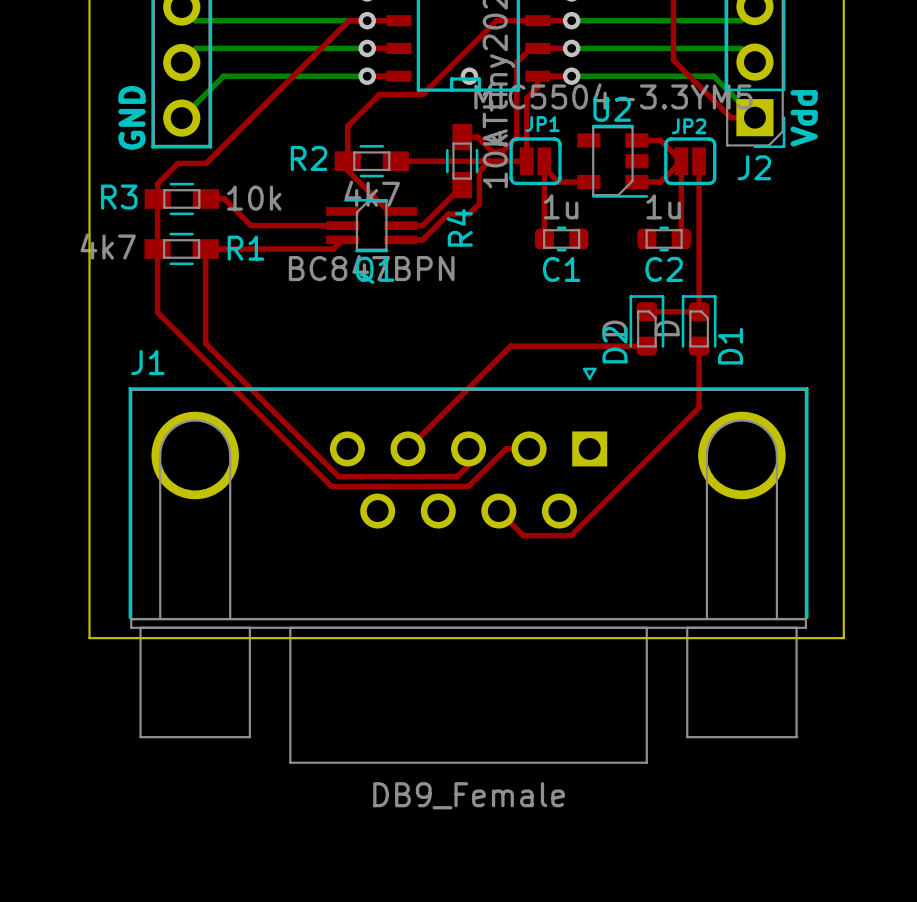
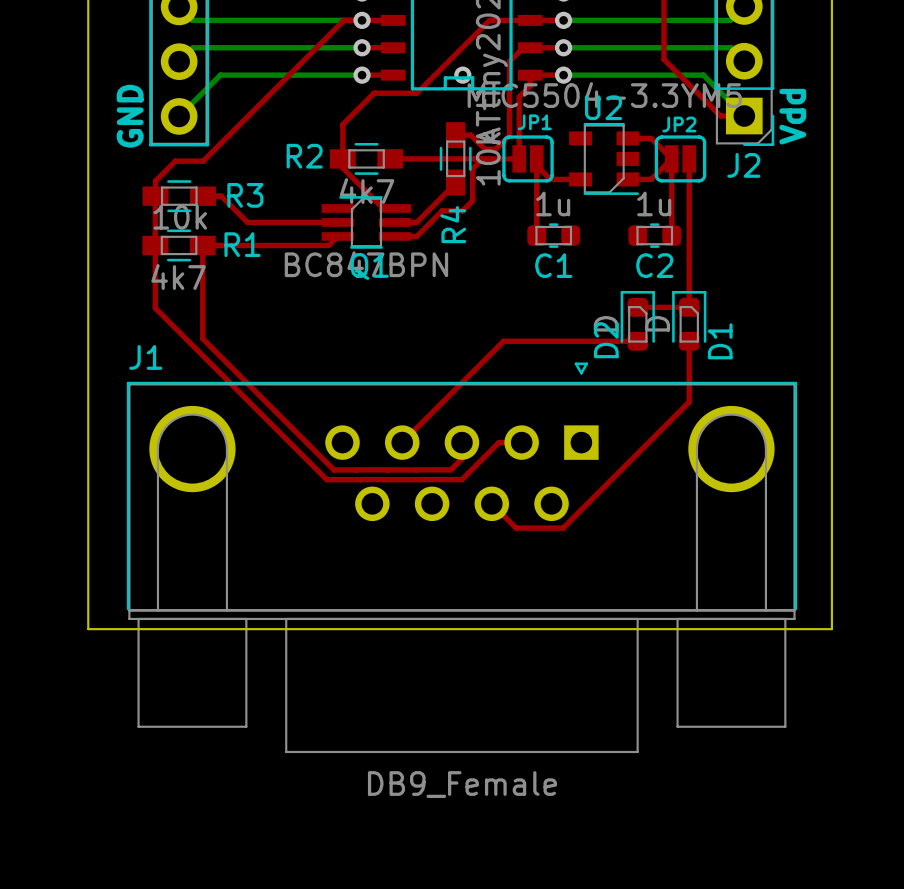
R3 name position: R3 (119, 197) -> R3 (245, 195)
R3 value position: 10k (254, 198) -> 10k (180, 217)
R1 value position: 4k7 (108, 246) -> 4k7 (178, 276)

